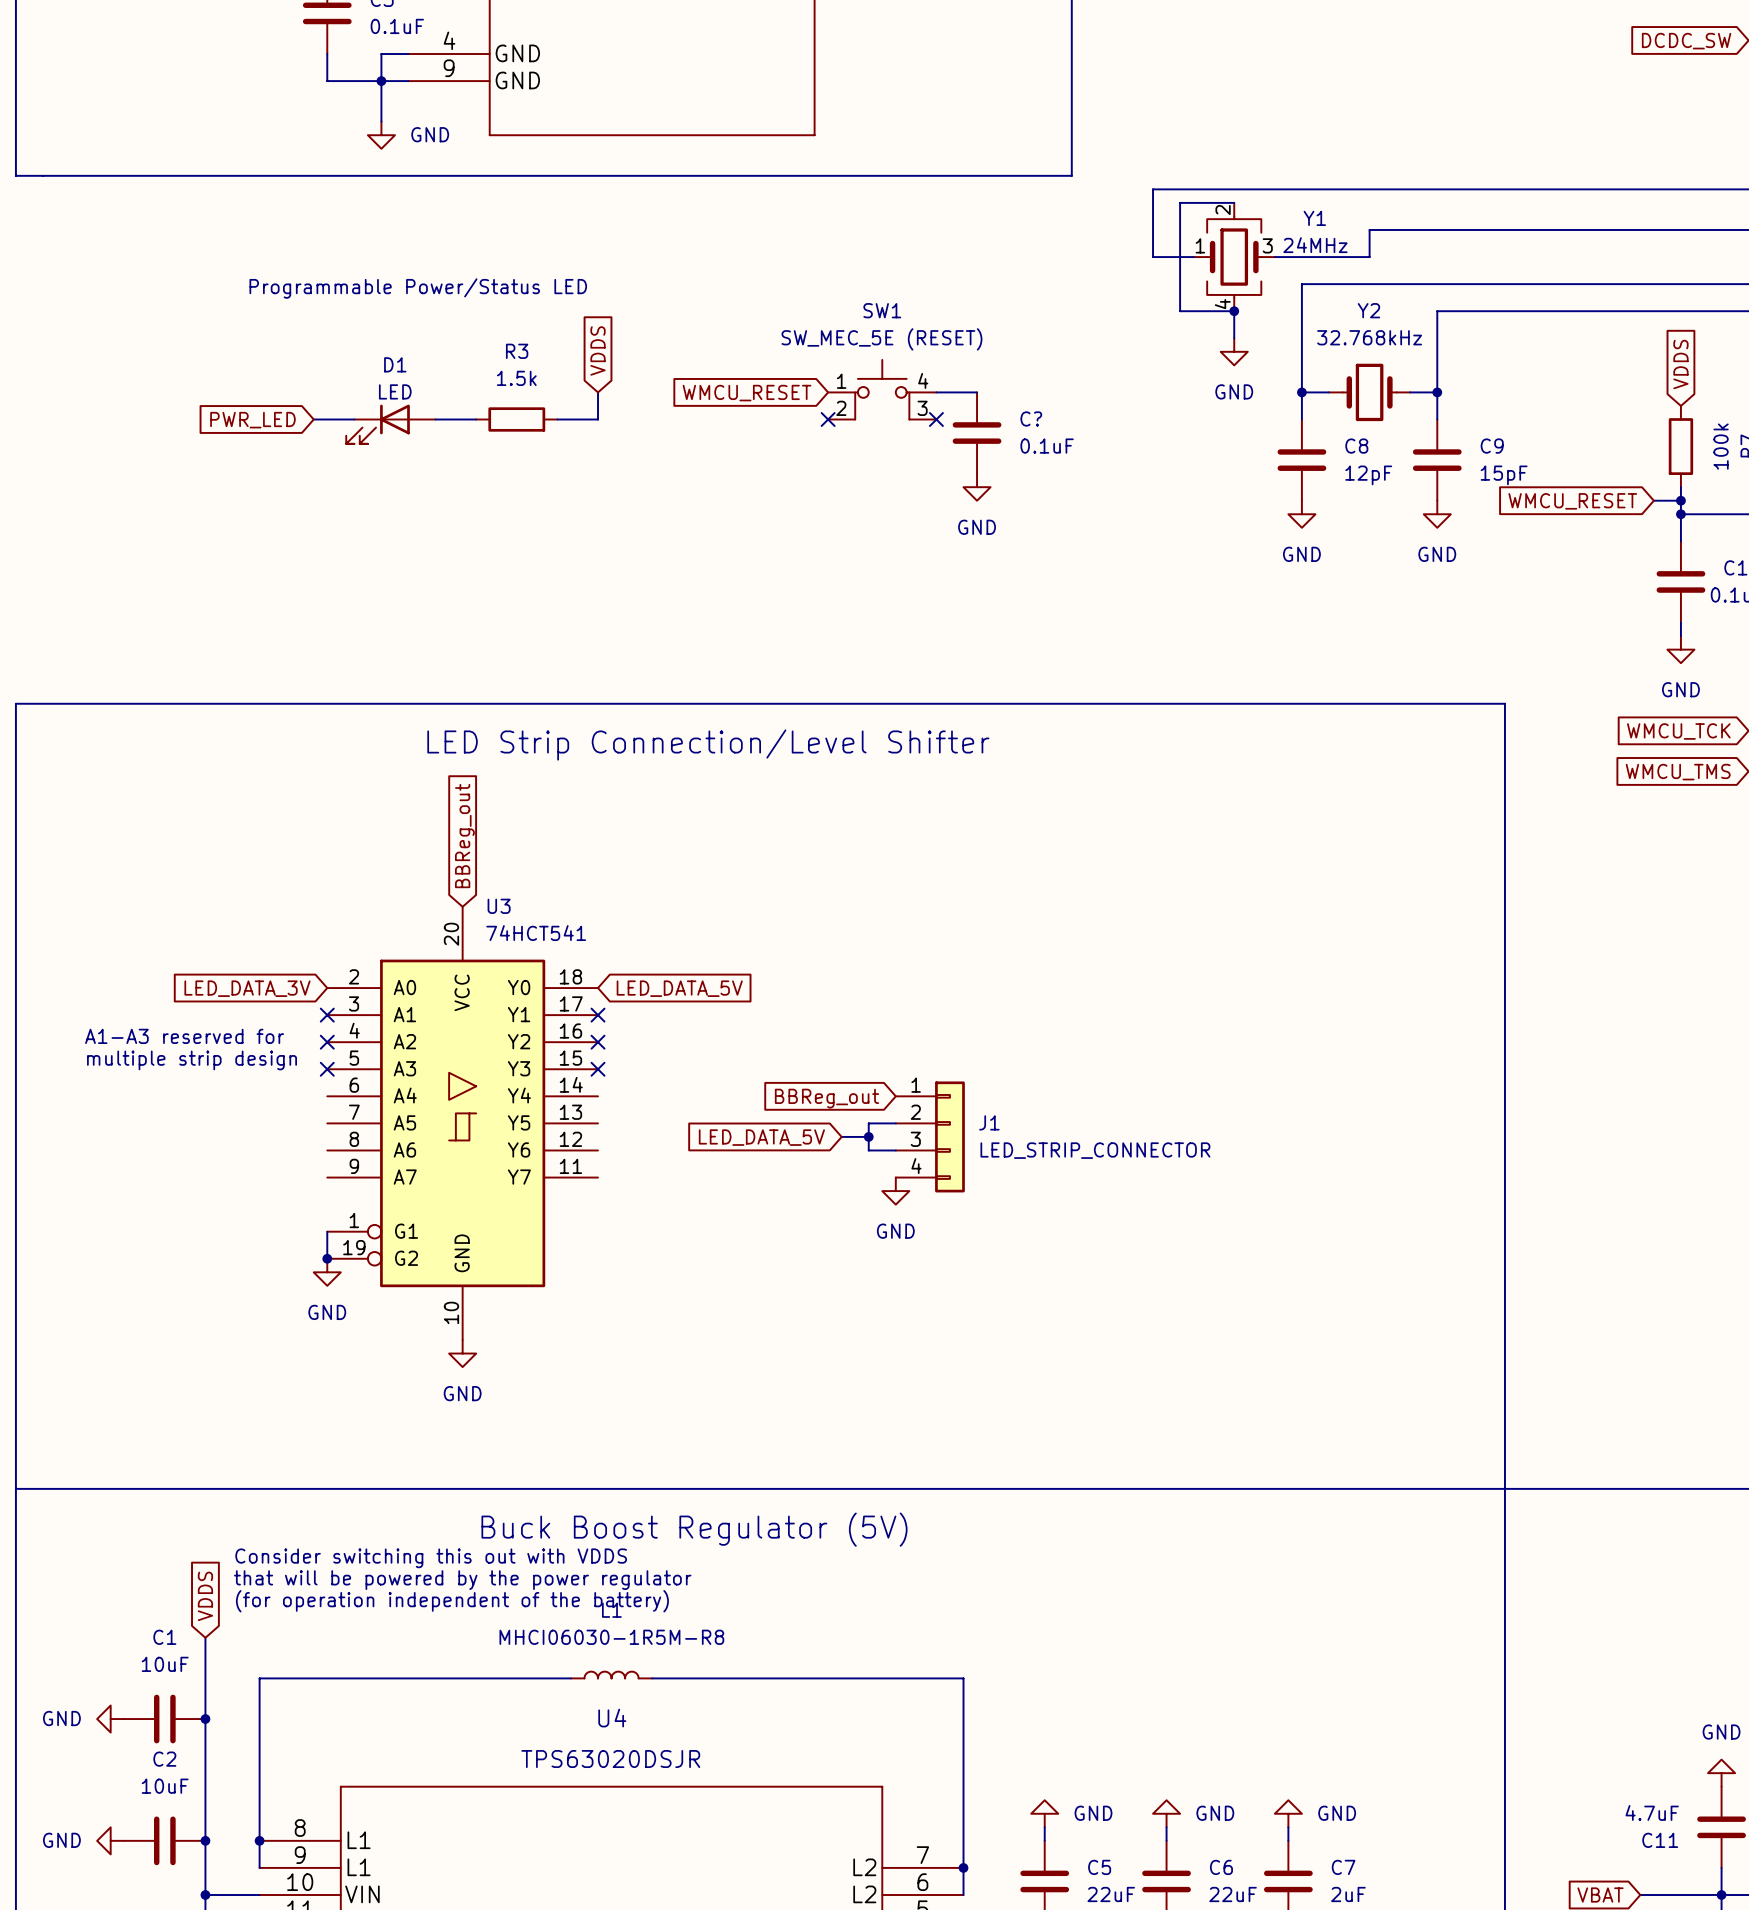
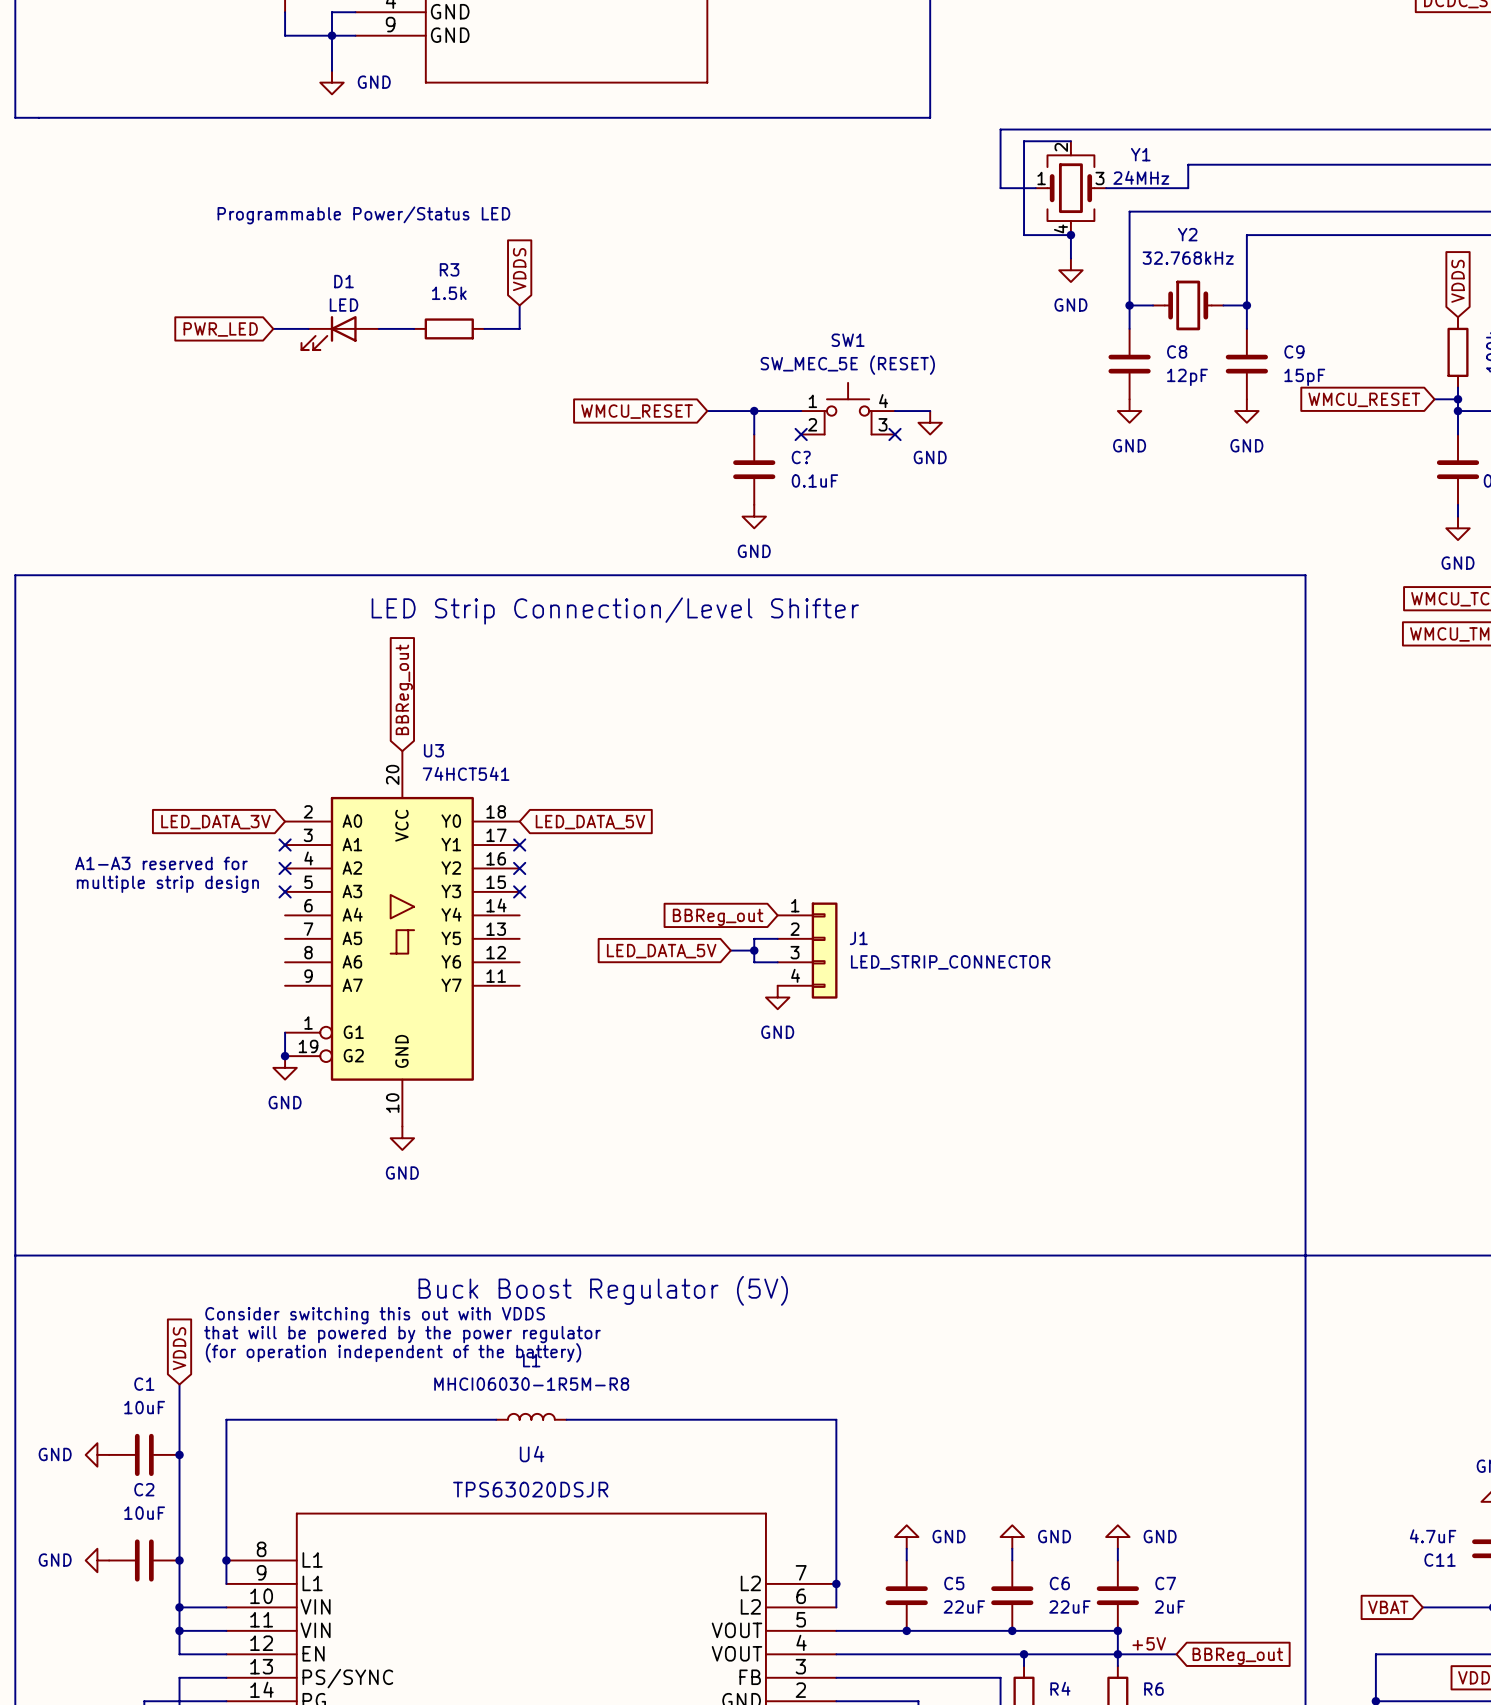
SW1 position: (882, 389) -> (848, 408)
wire: (936, 392) (977, 392) -> (894, 411) (930, 411)
global label position: WMCU_RESET (747, 393) -> WMCU_RESET (637, 411)
no-connect mark: (828, 419) -> none
no-connect mark: (936, 419) -> none
C? position: (977, 433) -> (754, 469)
power symbol: GND (977, 487) -> none
wire: none -> (707, 411) (801, 411)
wire: none -> (754, 411) (754, 434)
junction: none -> (754, 411)
power symbol: none -> GND (930, 422)
no-connect mark: none -> (801, 434)
no-connect mark: none -> (894, 434)
power symbol: none -> GND (754, 516)

